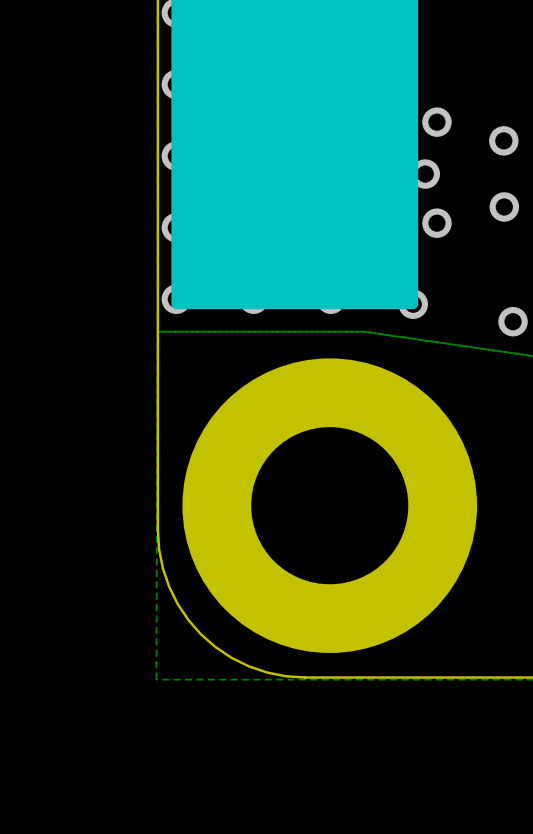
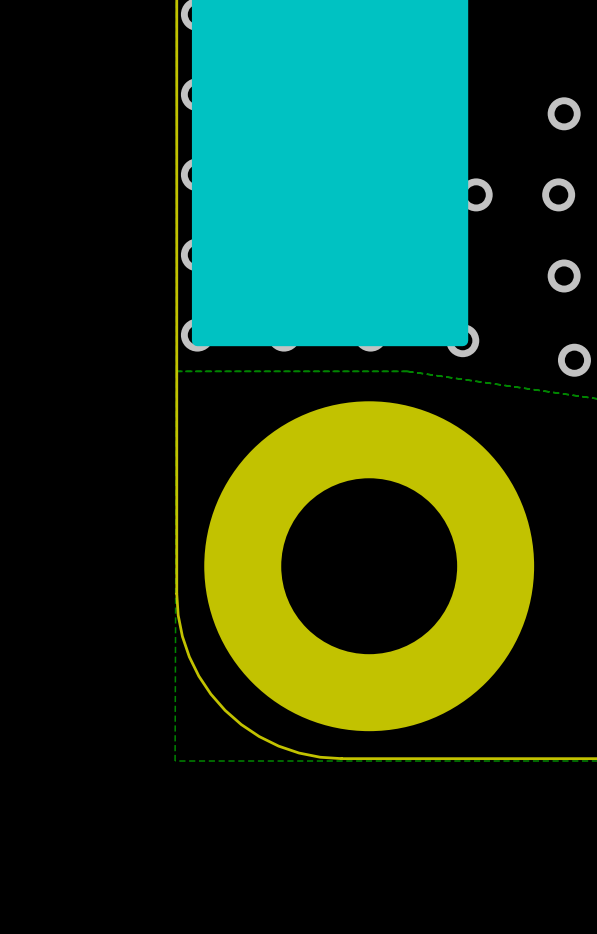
via: none -> (564, 113)
via: (436, 122) -> none
via: (503, 140) -> none
via: none -> (558, 194)
via: (504, 206) -> none
via: (436, 223) -> none
via: none -> (564, 275)

